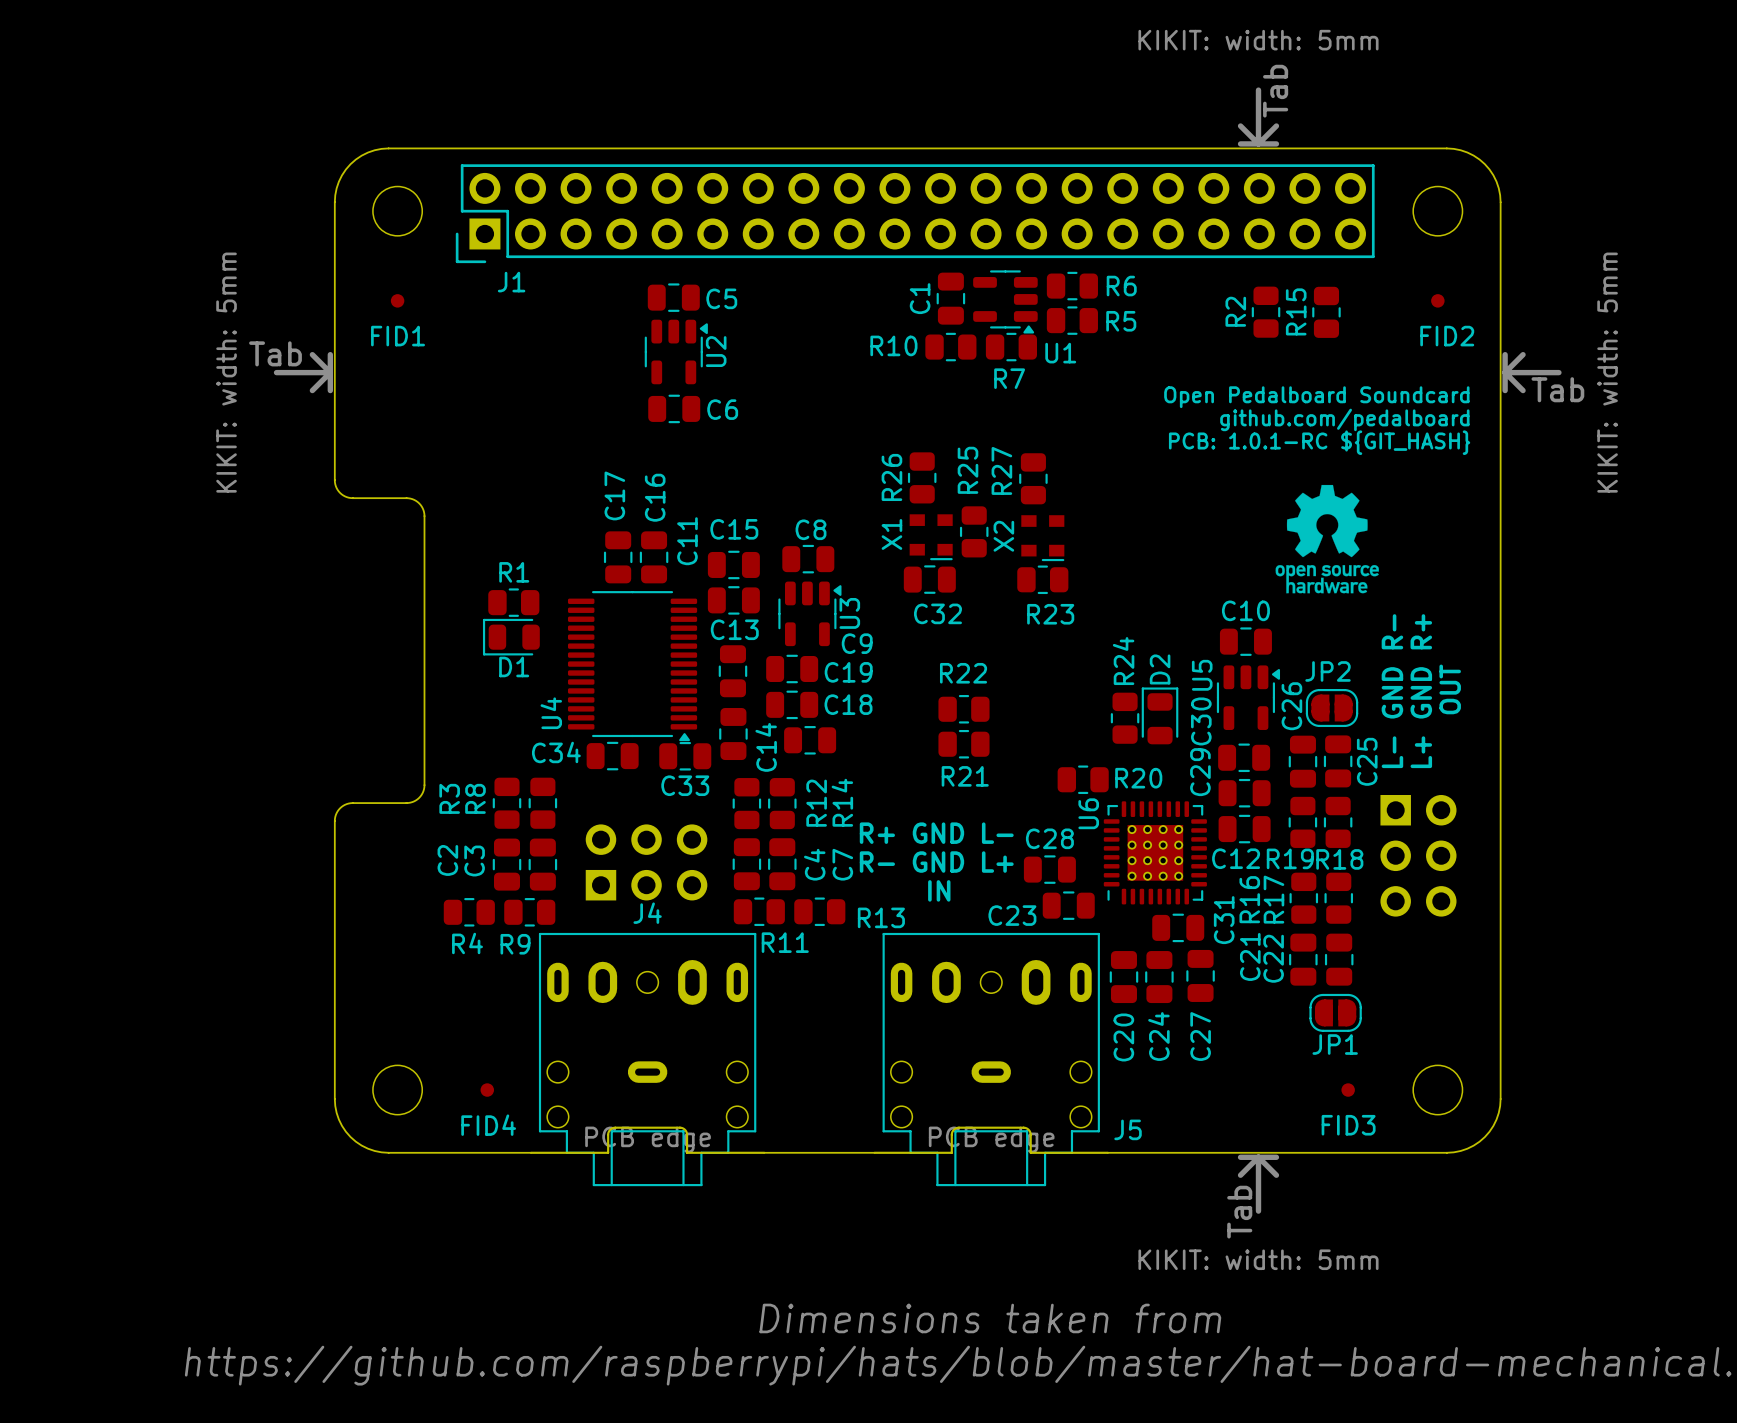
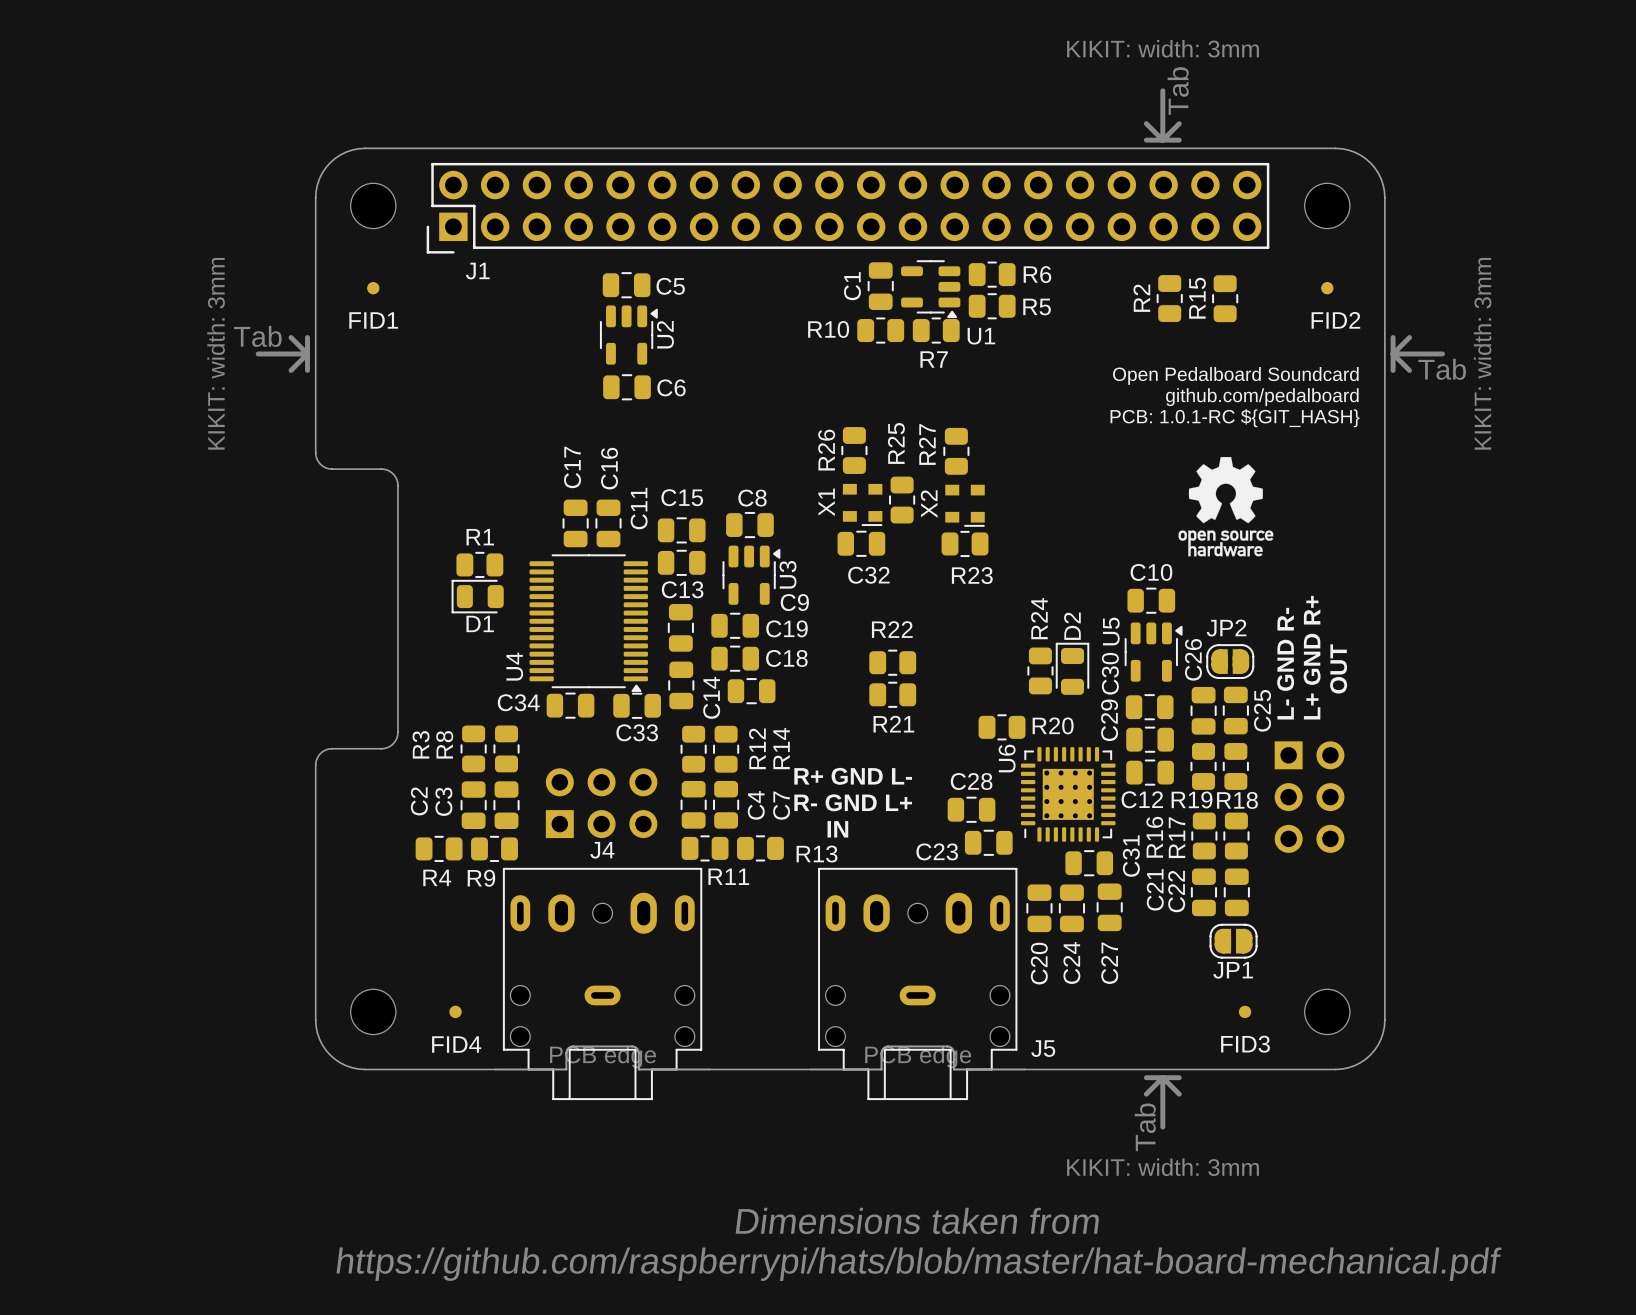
drawing shape: [1138, 29, 1379, 147] -> [1067, 39, 1259, 143]
drawing shape: [216, 252, 334, 493] -> [207, 257, 310, 450]
drawing shape: [1502, 252, 1618, 493] -> [1390, 257, 1492, 450]
drawing shape: [1138, 1154, 1379, 1271] -> [1067, 1075, 1259, 1177]

